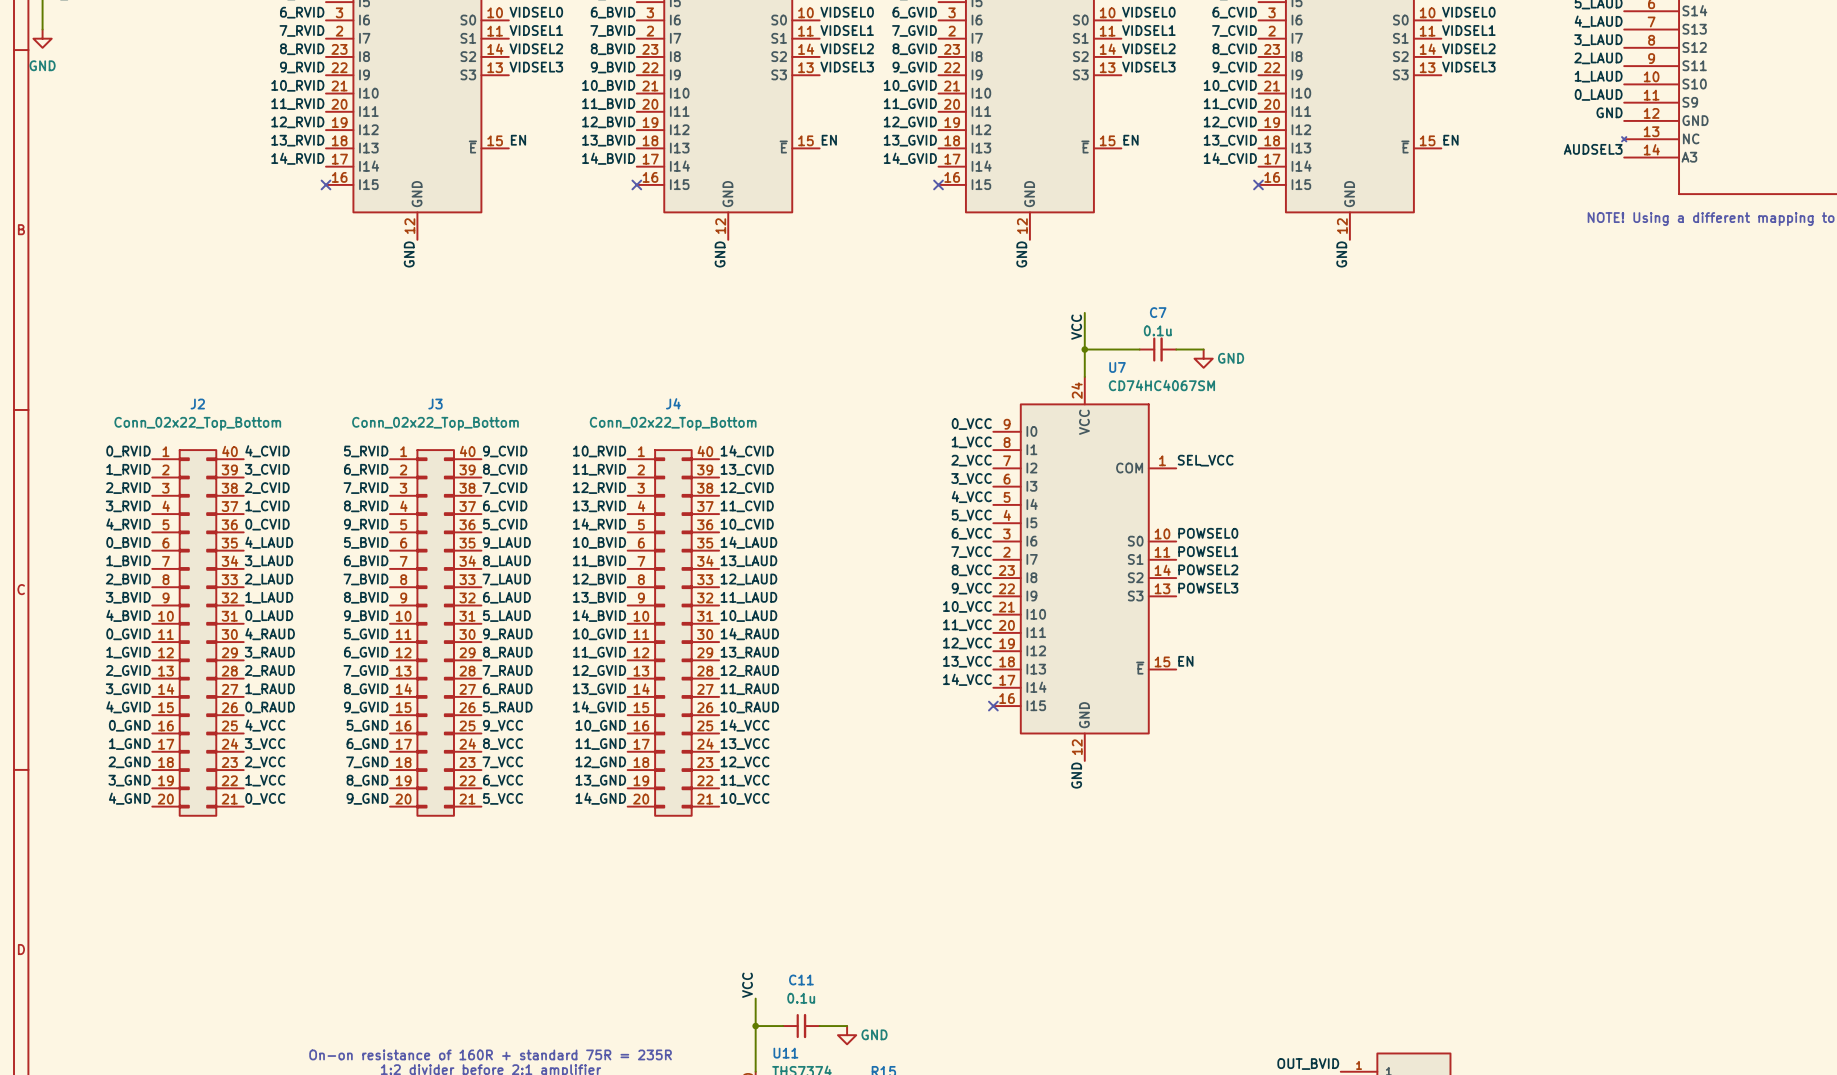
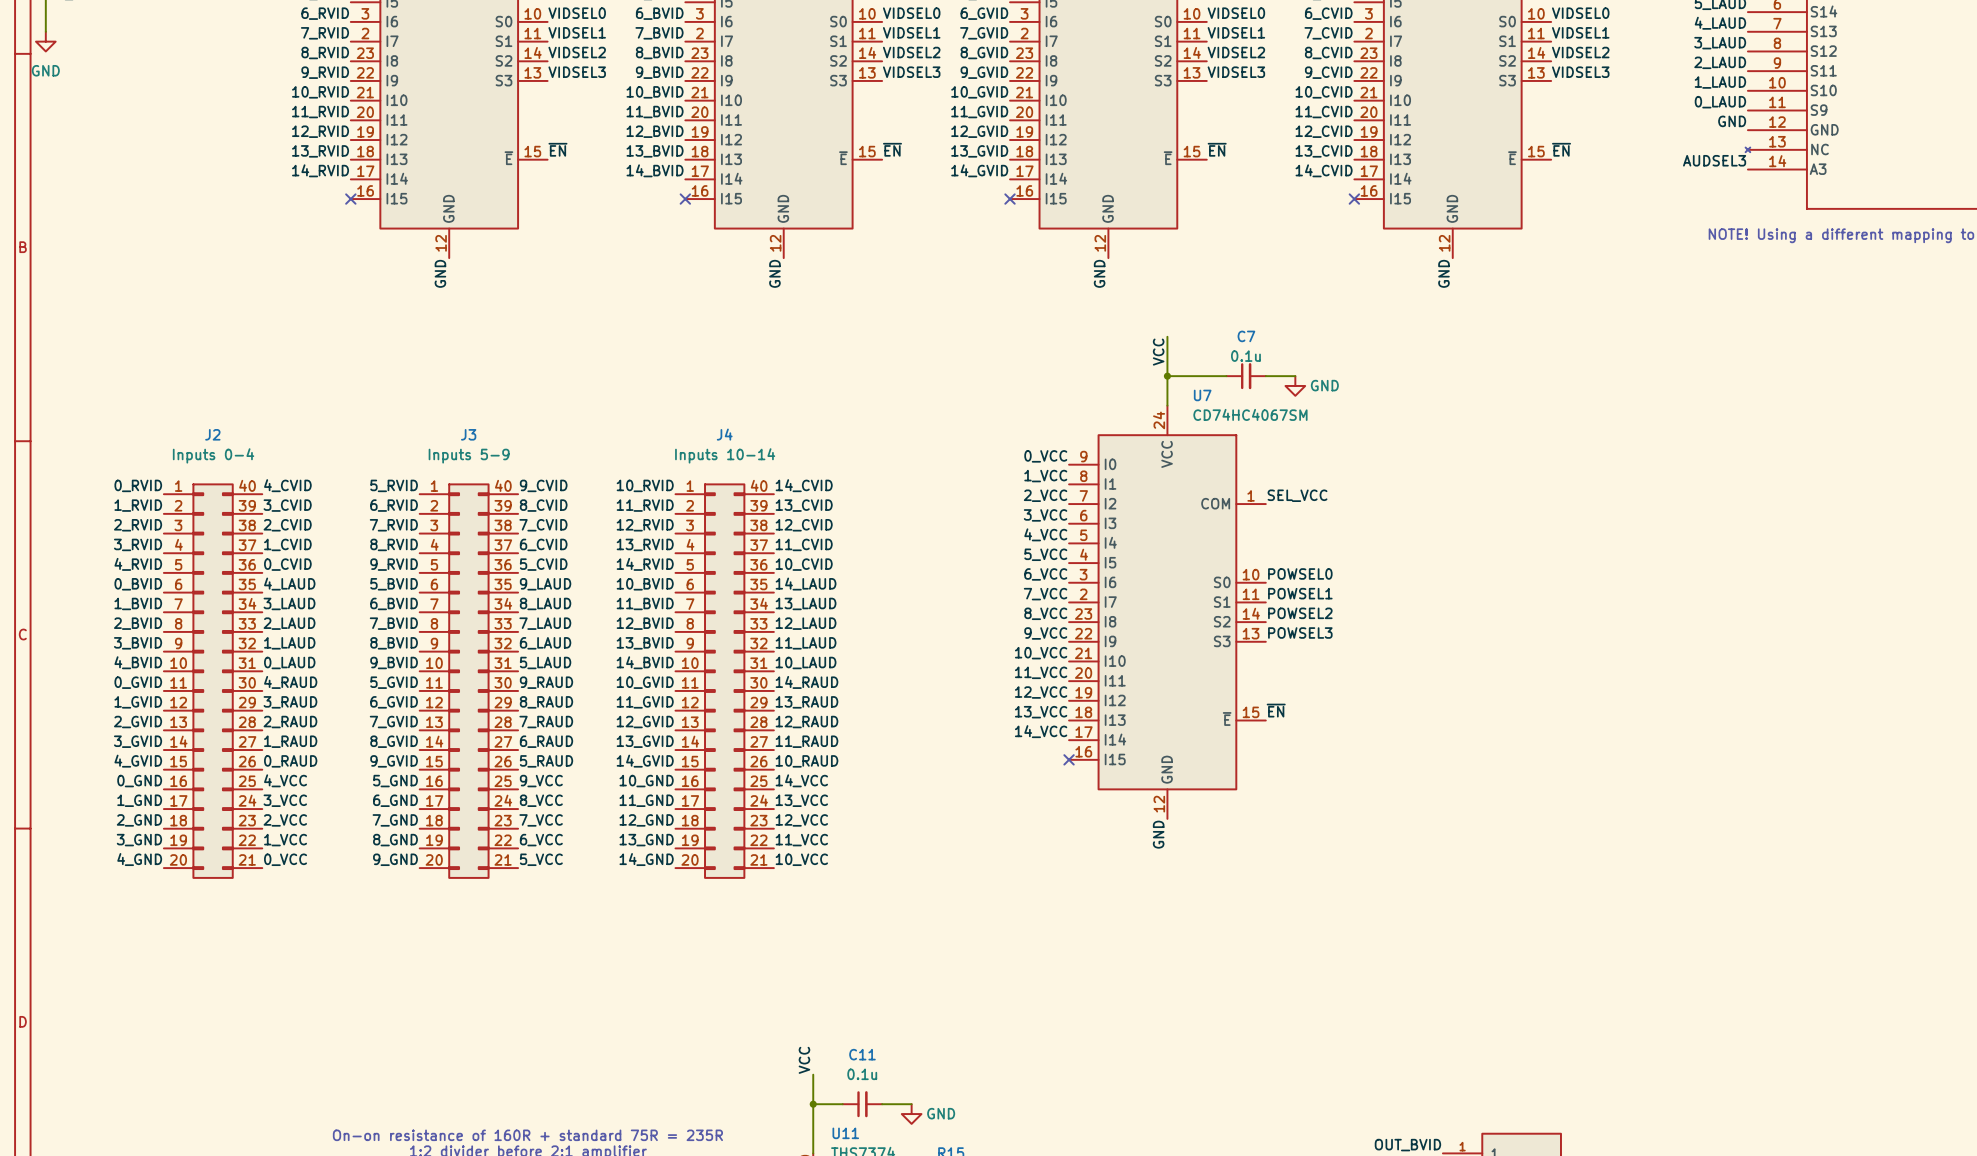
label: EN (518, 140) -> ~{EN} (557, 149)
label: EN (829, 140) -> ~{EN} (892, 149)
label: EN (1131, 140) -> ~{EN} (1217, 149)
label: EN (1450, 140) -> ~{EN} (1561, 149)
J2 value: Conn_02x22_Top_Bottom (197, 423) -> Inputs 0-4 (213, 455)
J3 value: Conn_02x22_Top_Bottom (435, 423) -> Inputs 5-9 (469, 456)
J4 value: Conn_02x22_Top_Bottom (673, 423) -> Inputs 10-14 (725, 455)
label: EN (1185, 661) -> ~{EN} (1276, 710)

